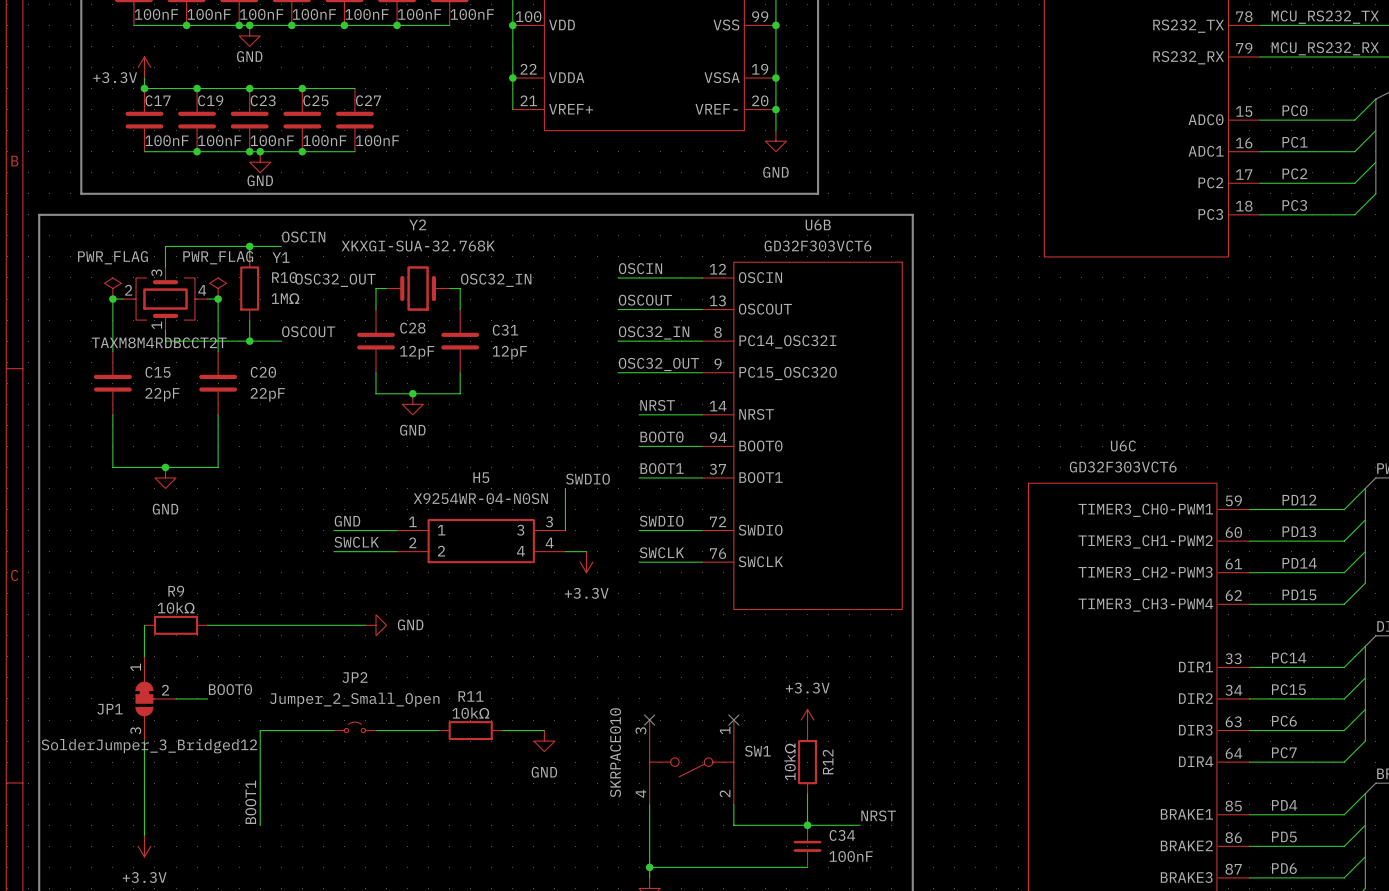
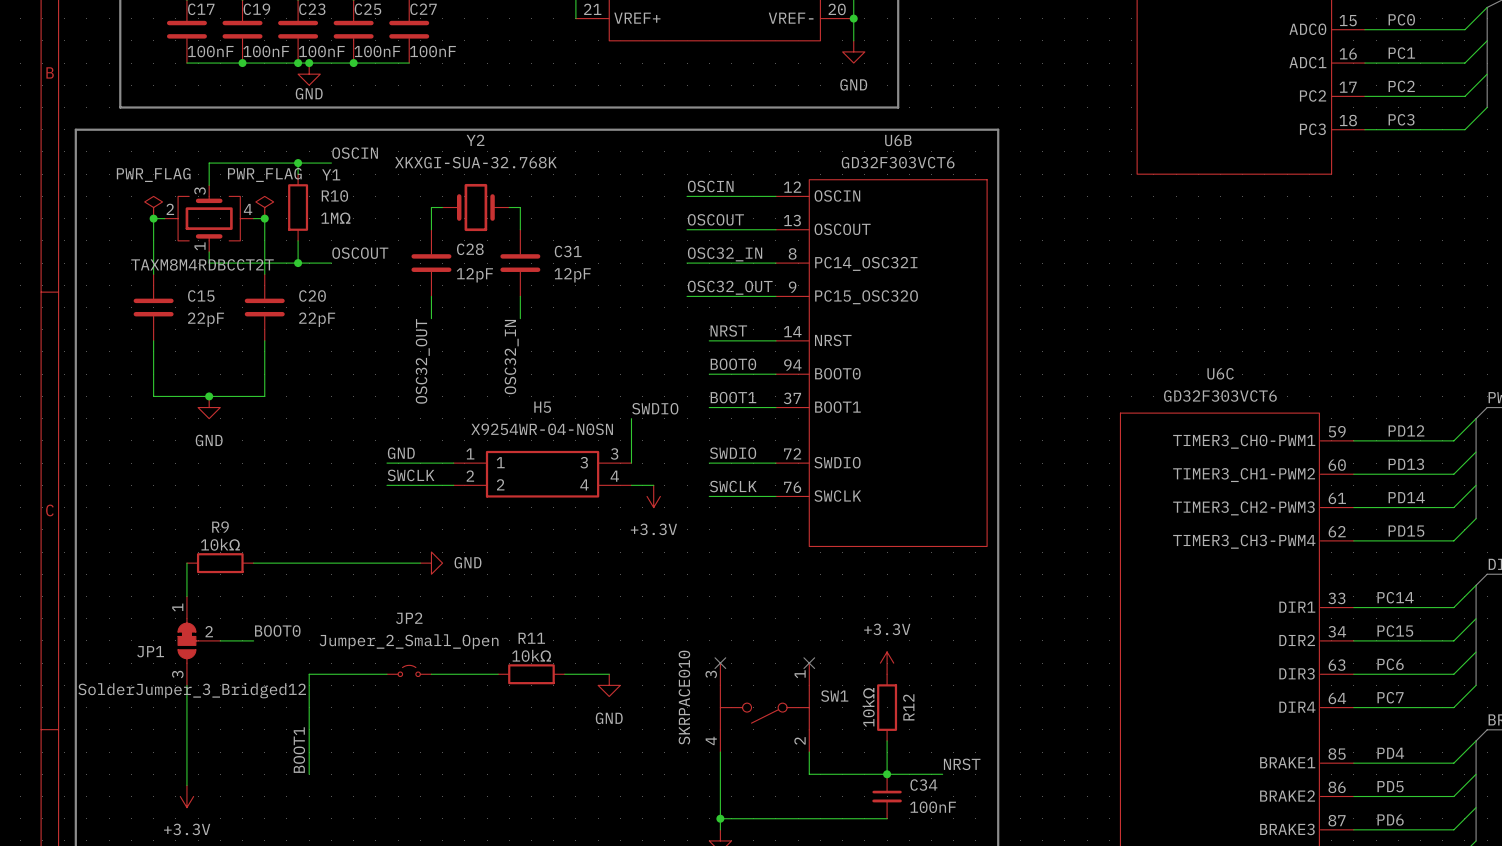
label rotation: 0° (335, 280) -> 90° counterclockwise (422, 361)
label position: OSC32_OUT (335, 280) -> OSC32_OUT (422, 361)
label rotation: 0° (496, 280) -> 90° counterclockwise (511, 357)
label position: OSC32_IN (496, 280) -> OSC32_IN (511, 357)
wire: (376, 393) (460, 393) -> none
junction: (412, 393) -> none
power symbol: GND (412, 404) -> none

